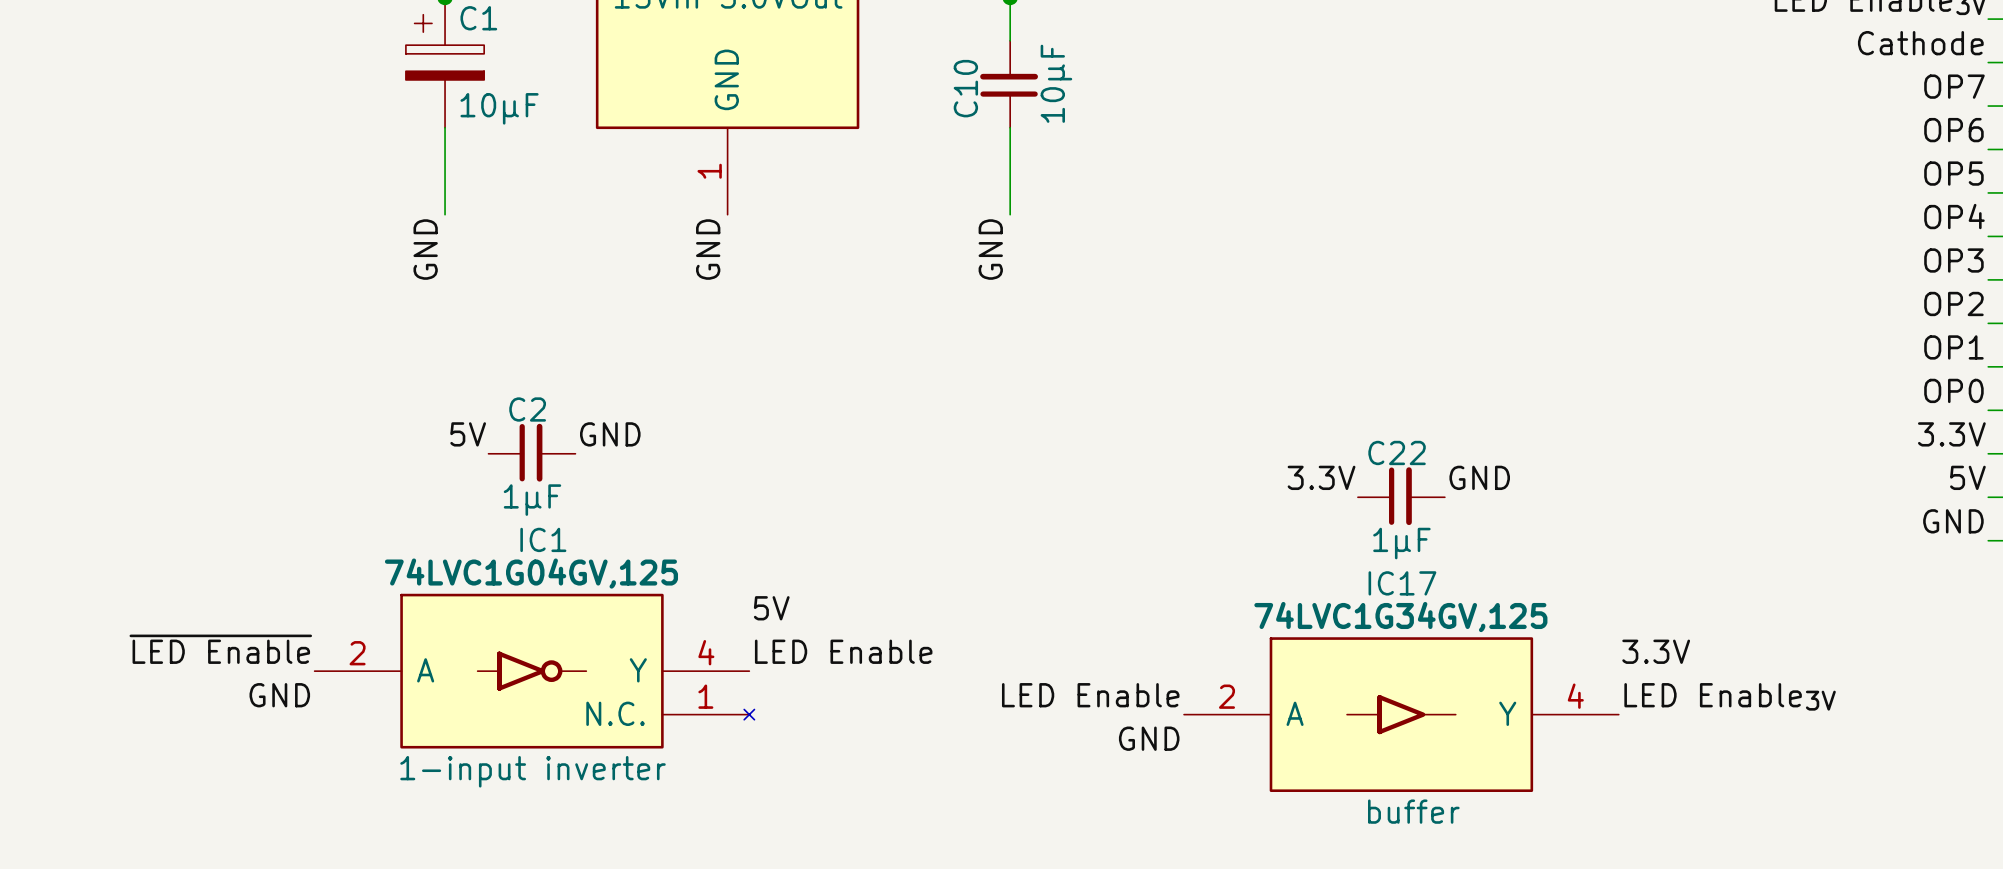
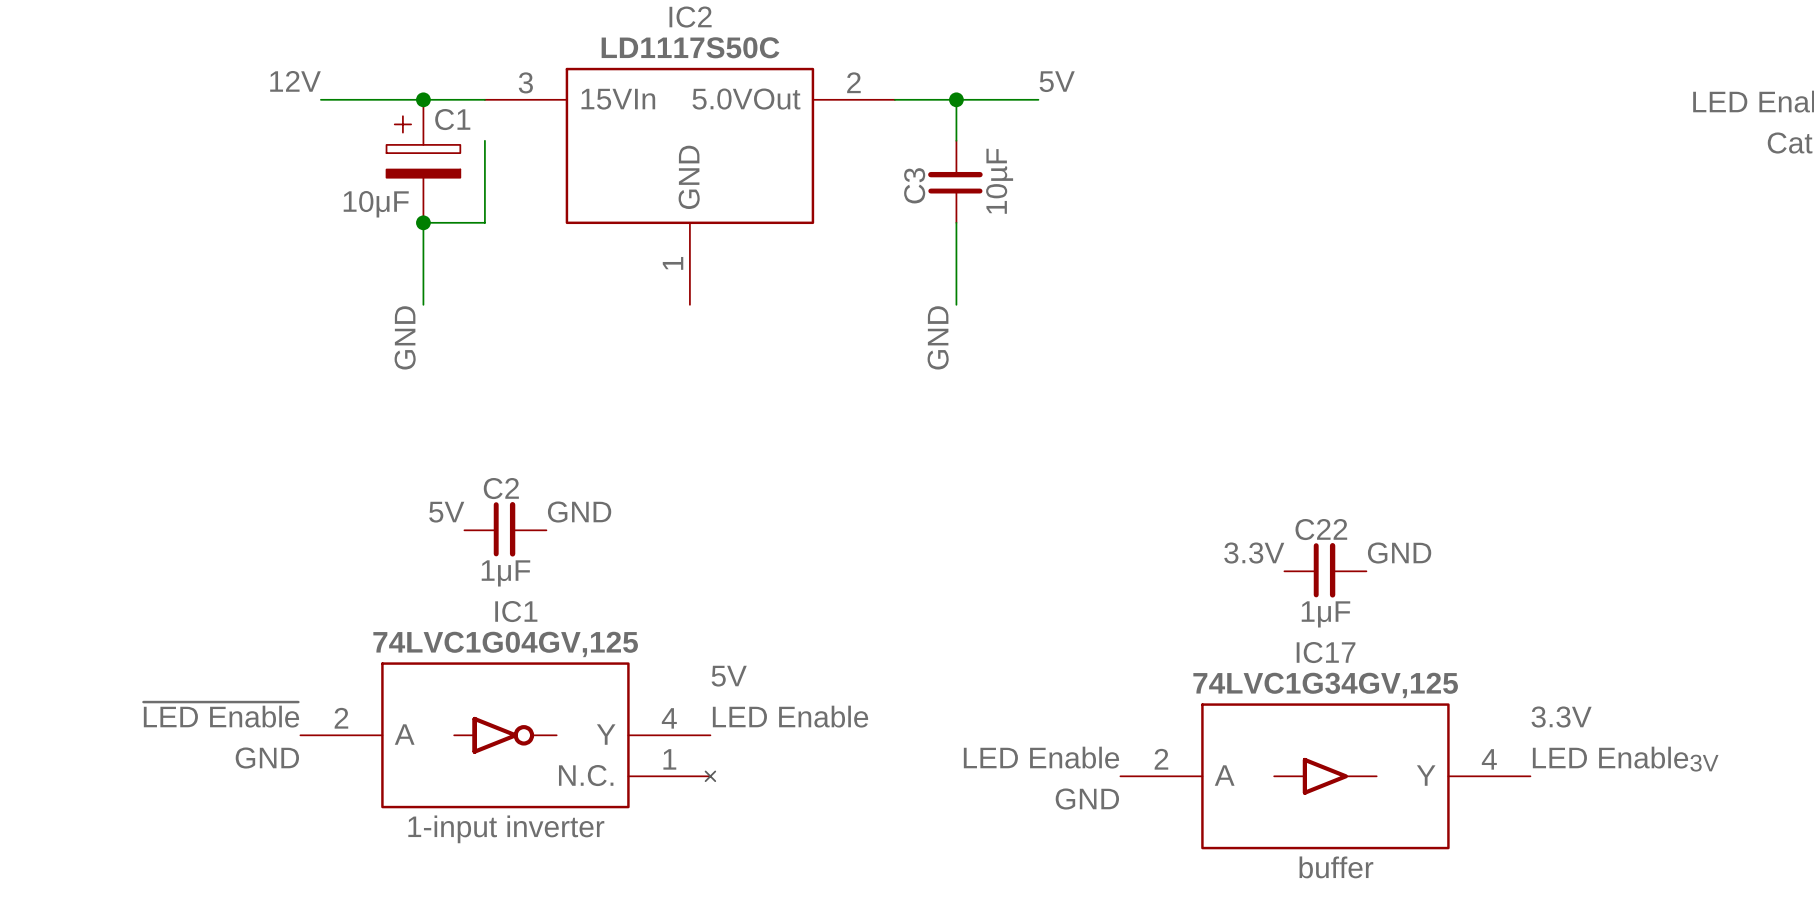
wire: none -> (484, 140) (484, 222) (423, 222)
C10 name: C10 (965, 88) -> C3 (914, 185)
C1 value position: 10μF (499, 108) -> 10μF (376, 204)
junction: none -> (423, 222)
label: GND (708, 249) -> none

